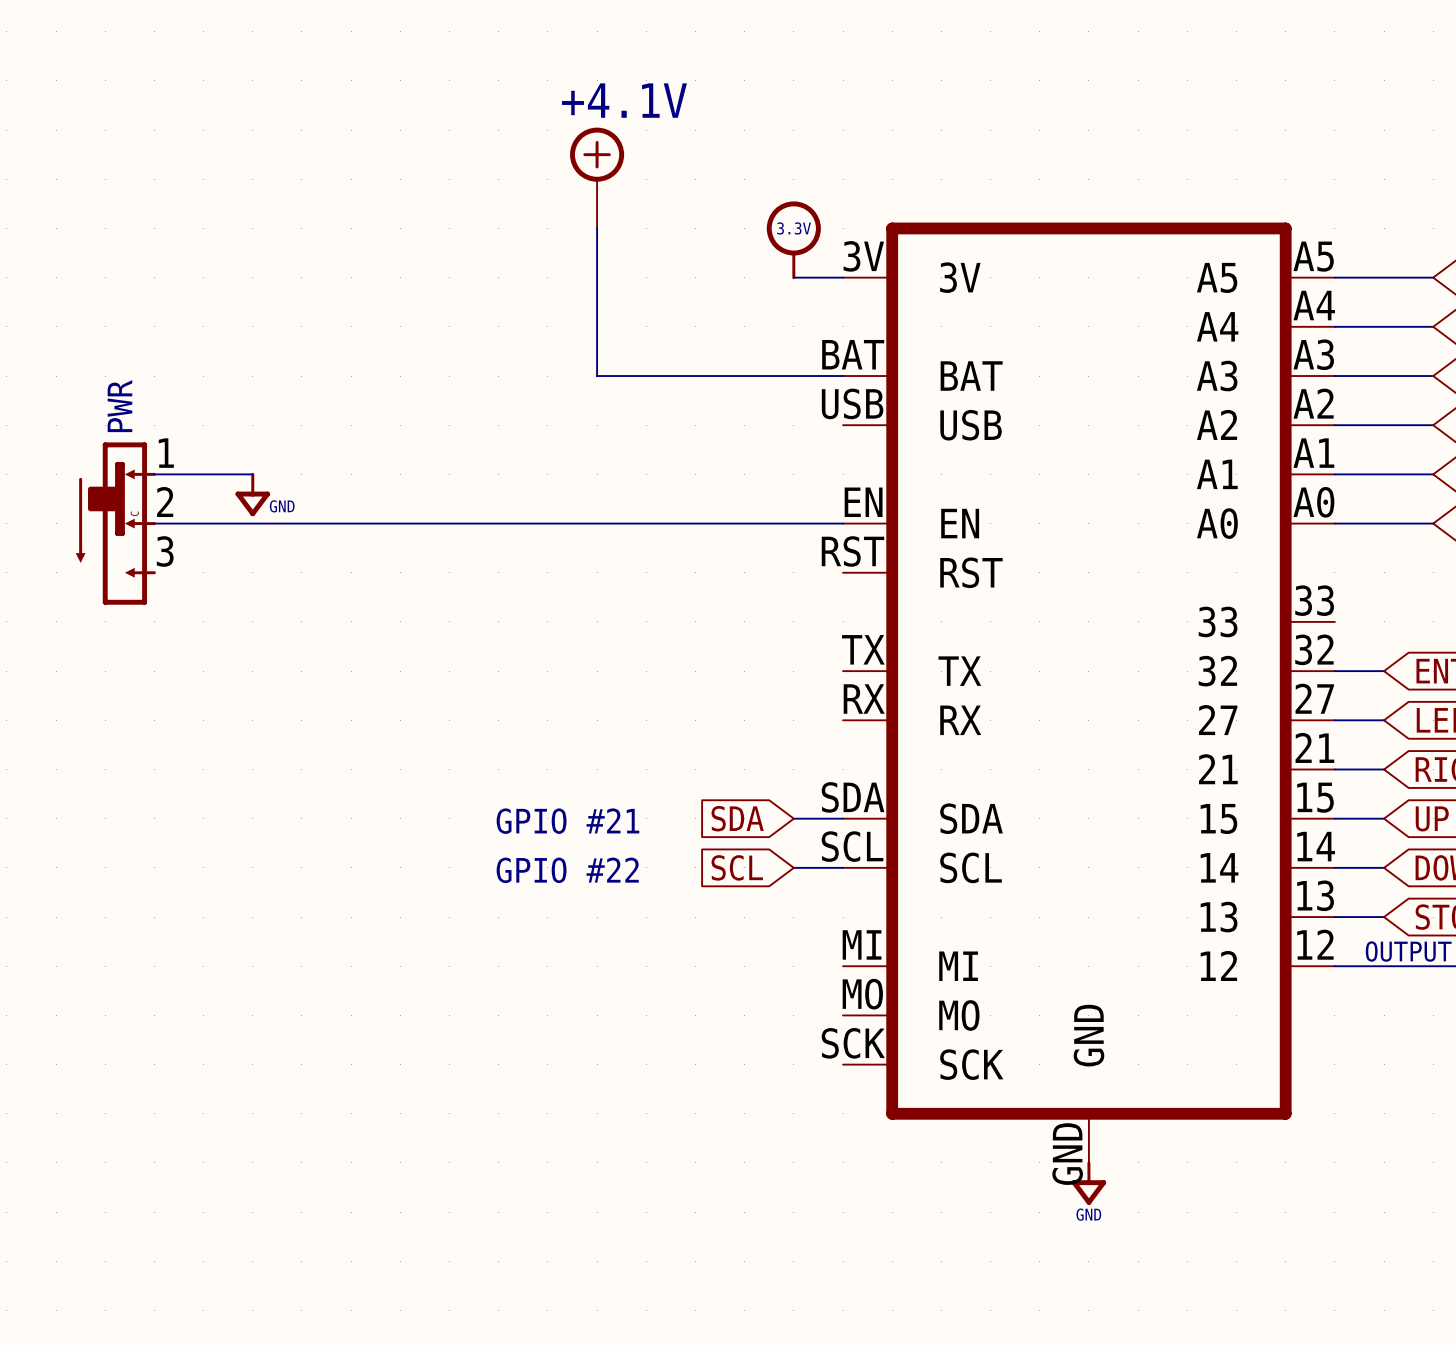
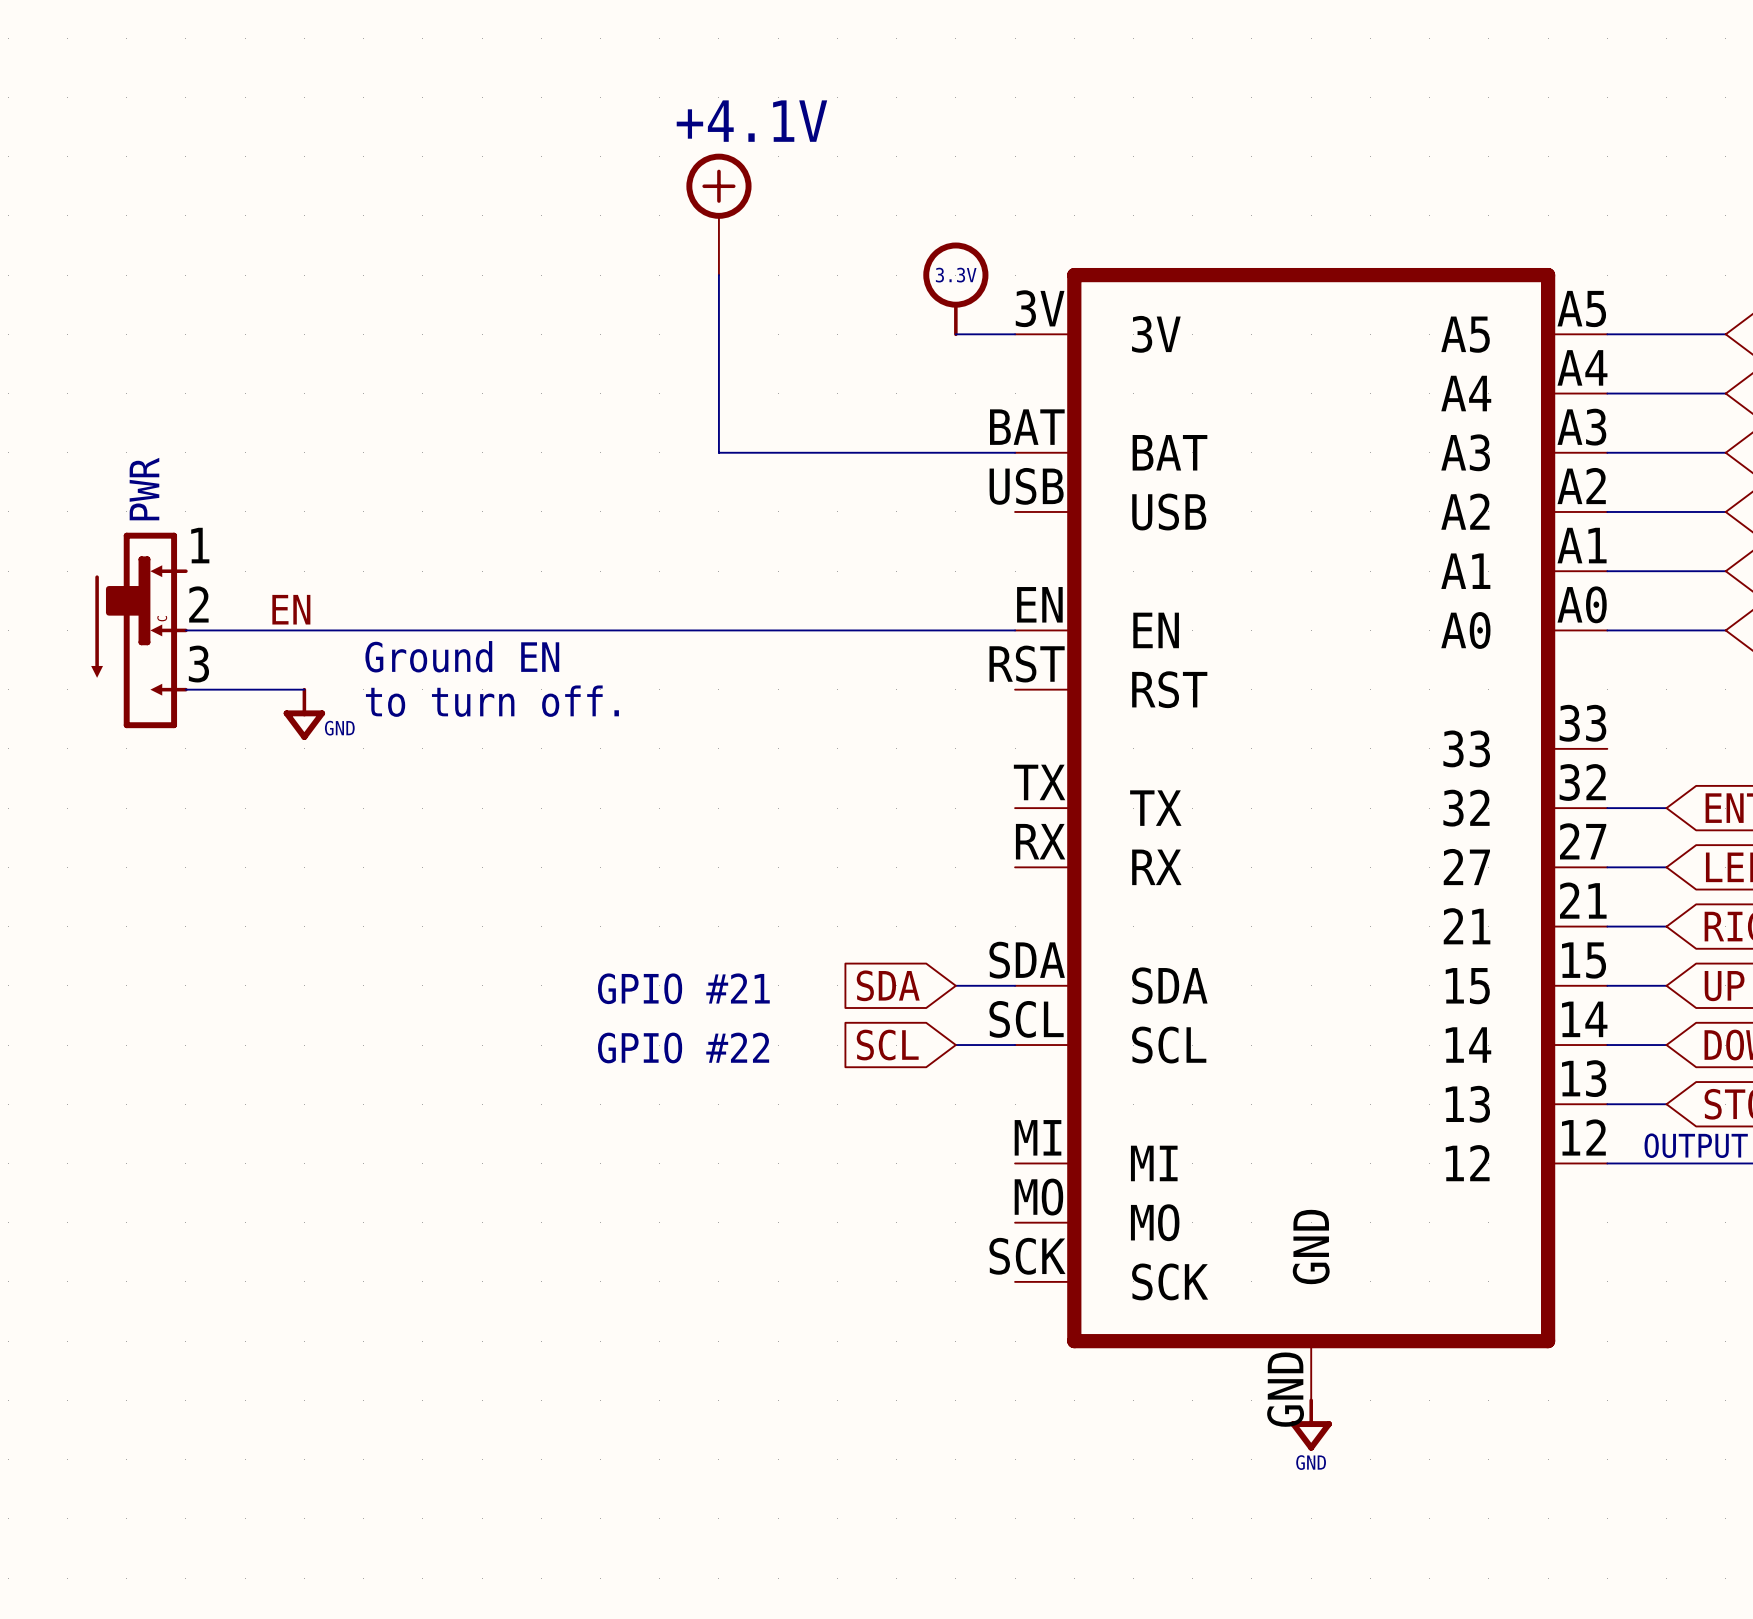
wire: (154, 474) (252, 474) -> (185, 689) (304, 689)
power symbol position: GND (252, 494) -> GND (304, 713)
label: none -> EN (291, 609)
text: none -> Ground EN (462, 656)
text: none -> to turn off. (492, 701)

